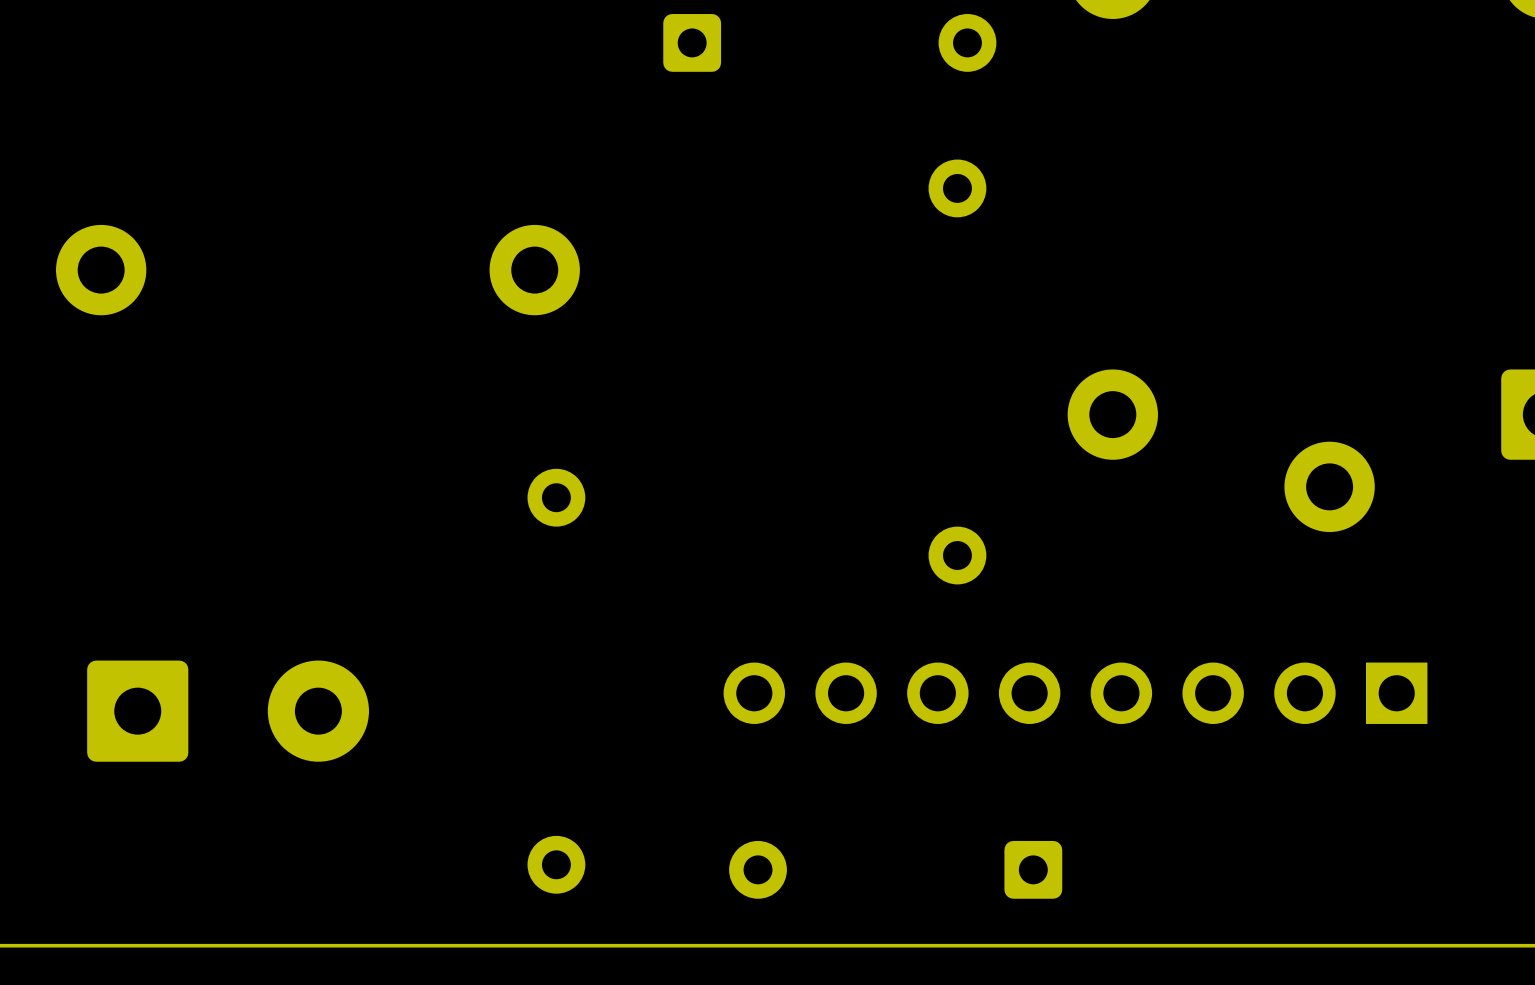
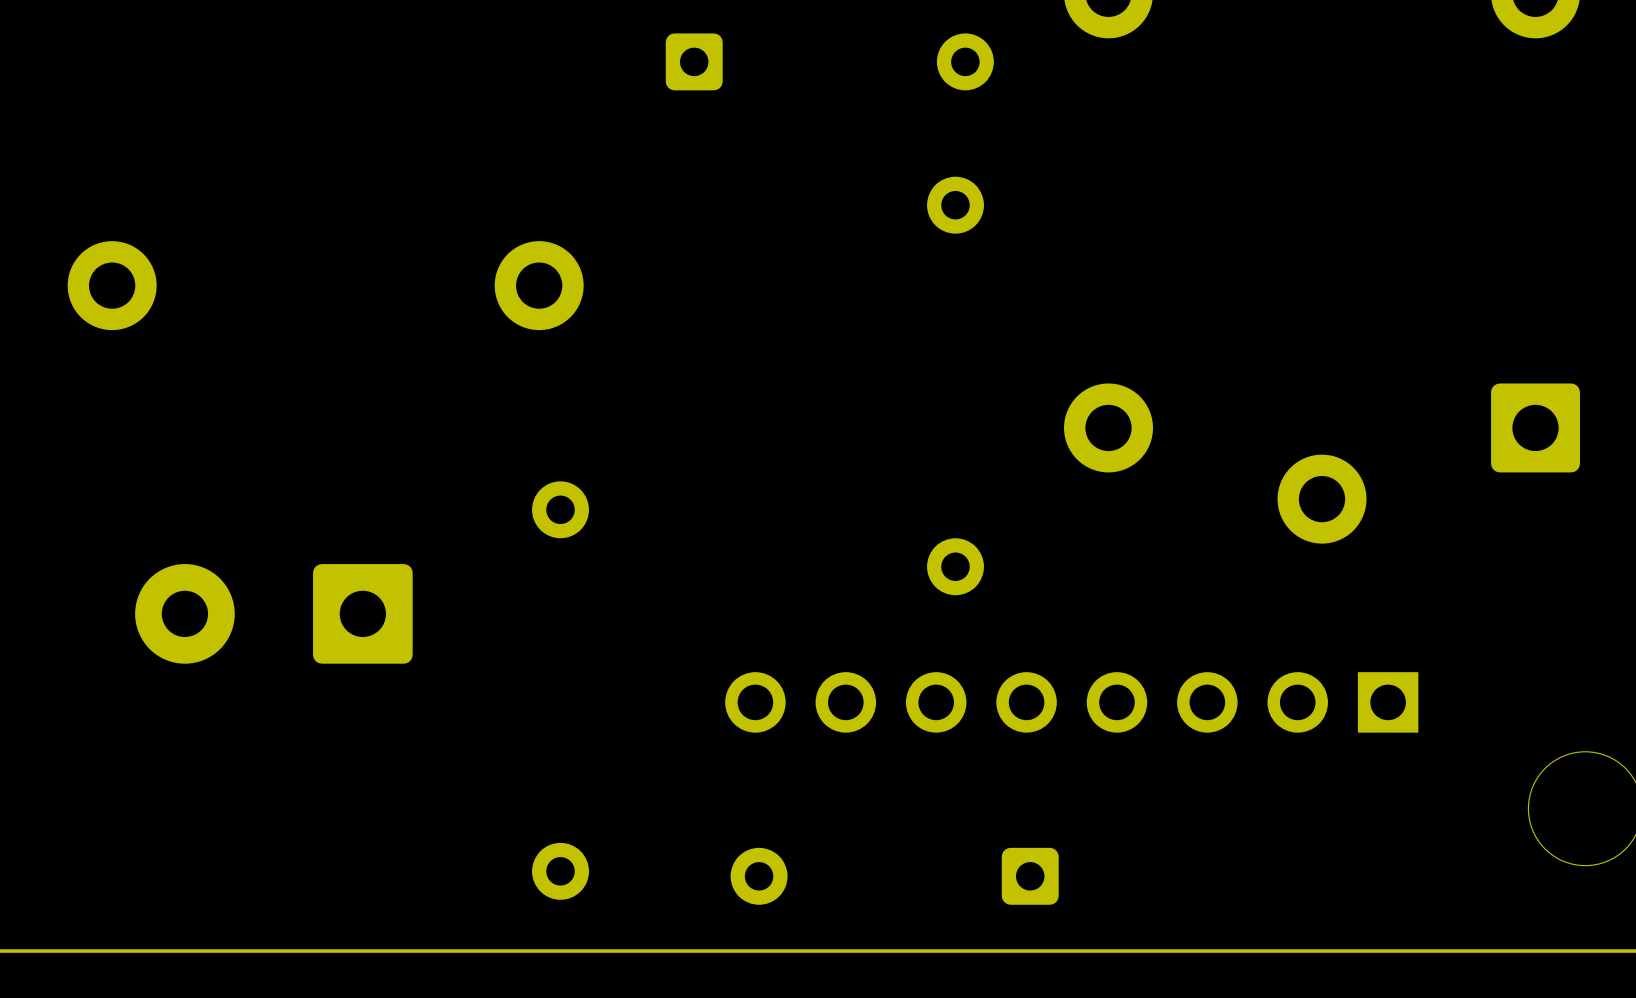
part rotation: 0° (228, 711) -> 180° (273, 613)

